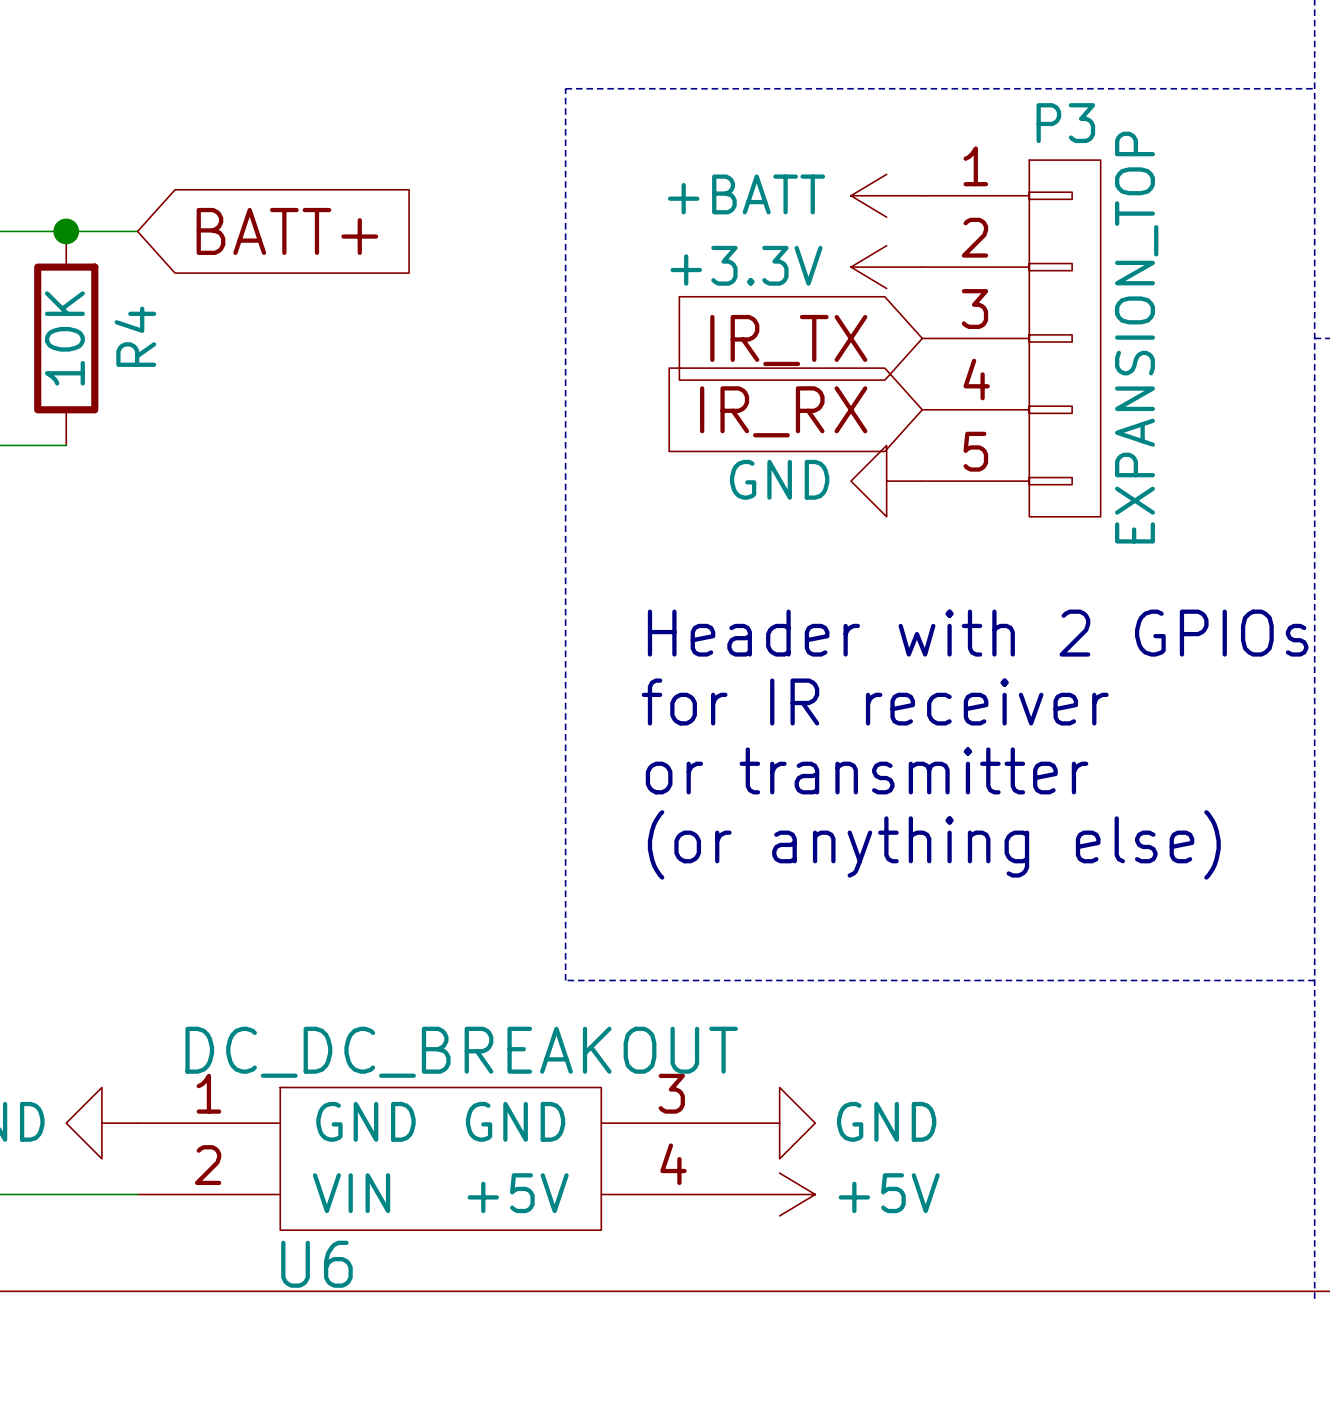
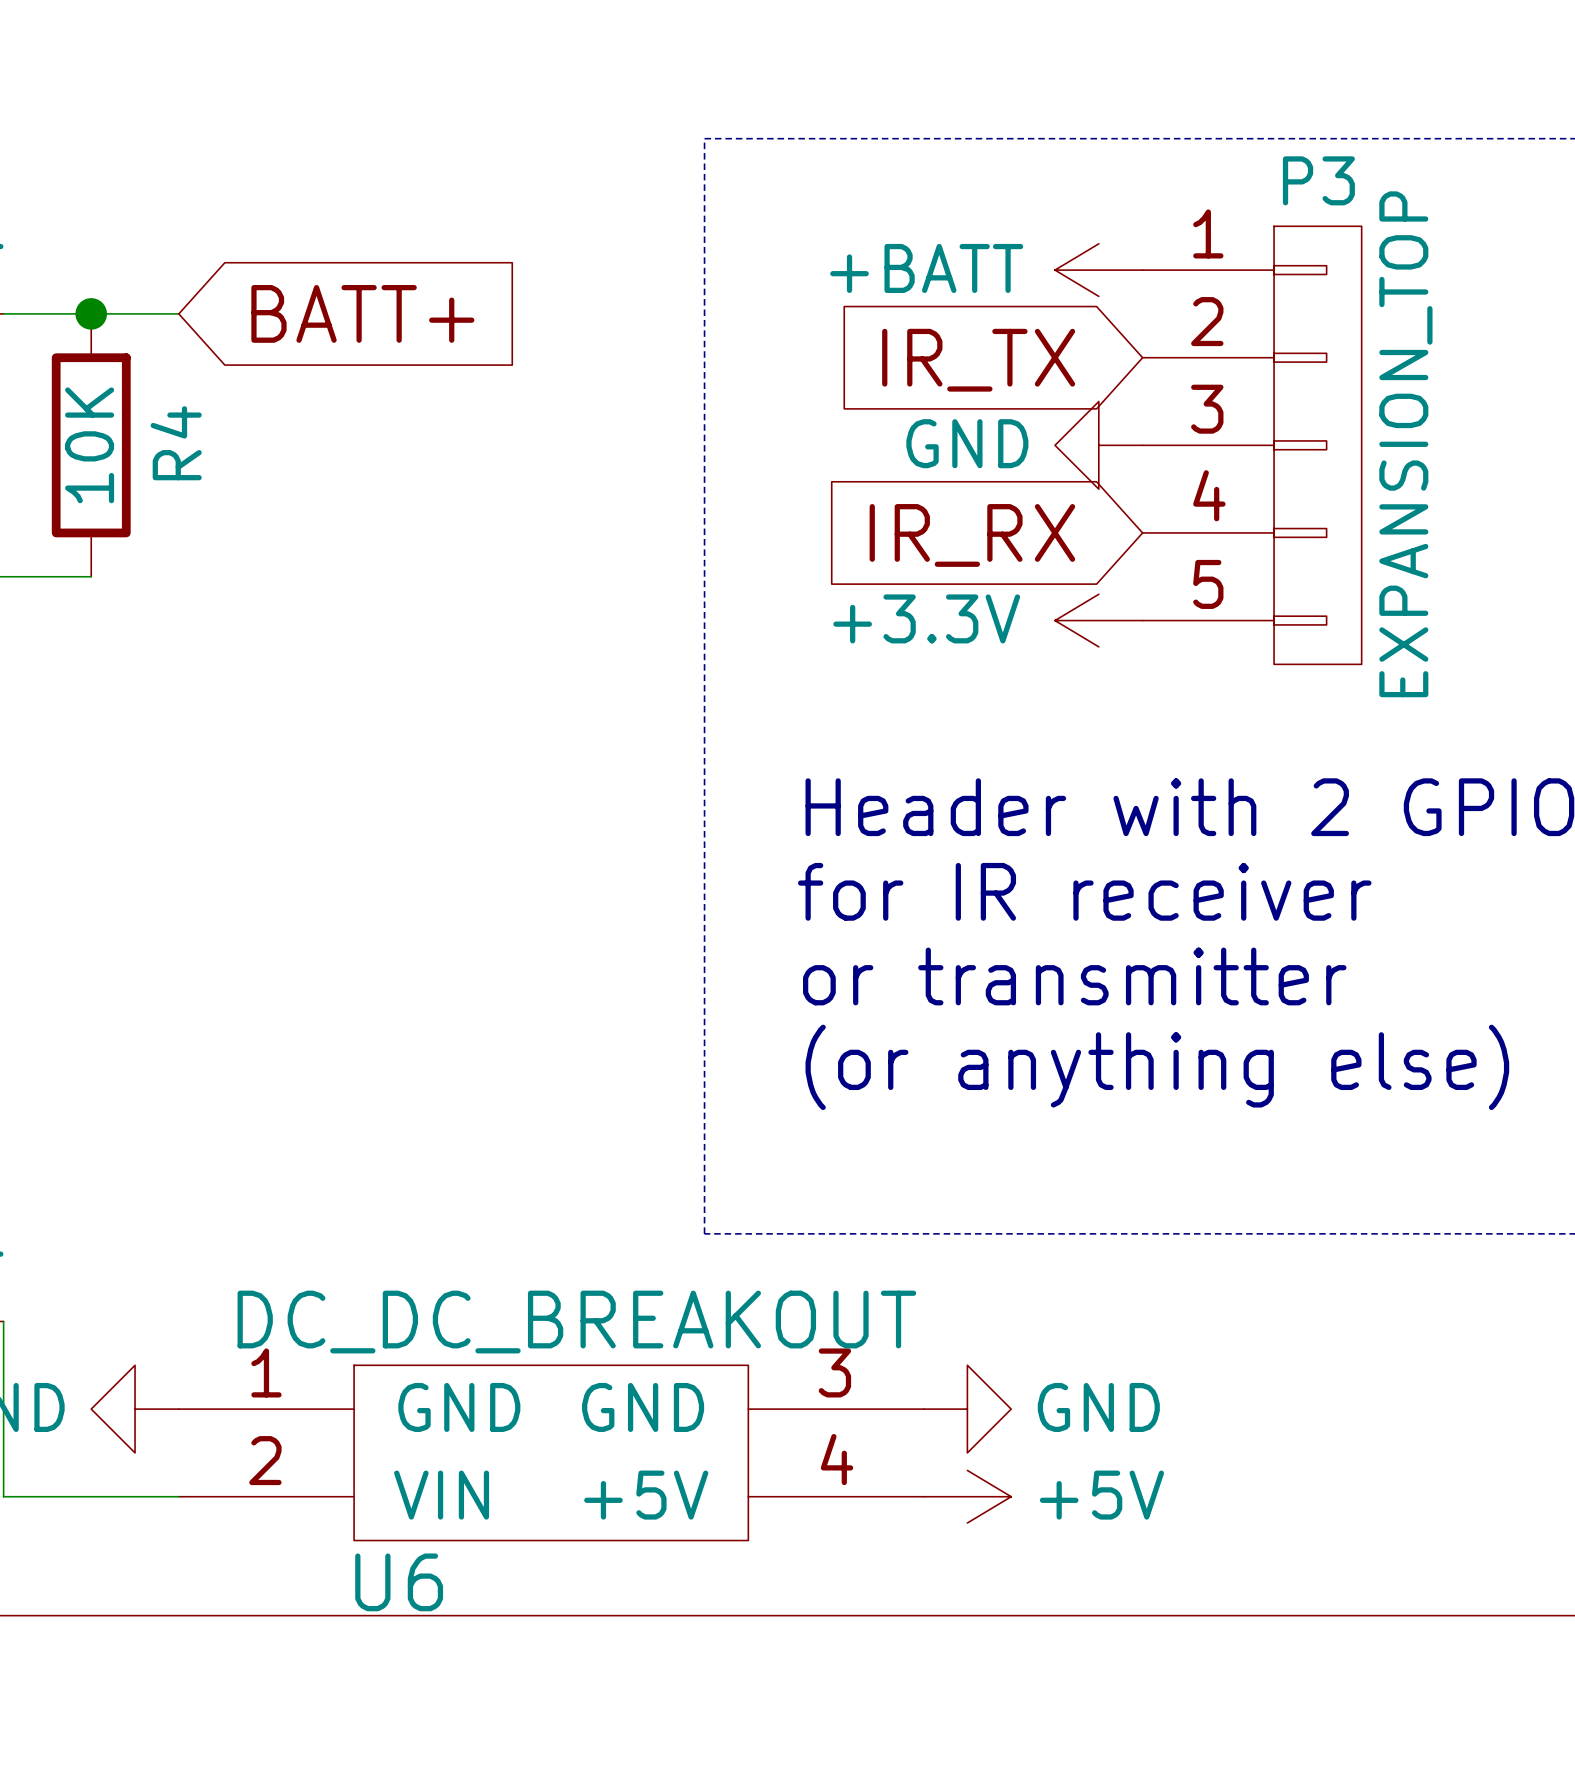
power symbol: +3.3V (886, 267) -> none
power symbol: none -> GND (1098, 445)
global label position: IR_TX (788, 340) -> IR_TX (978, 360)
power symbol: GND (886, 481) -> +3.3V (1098, 620)

